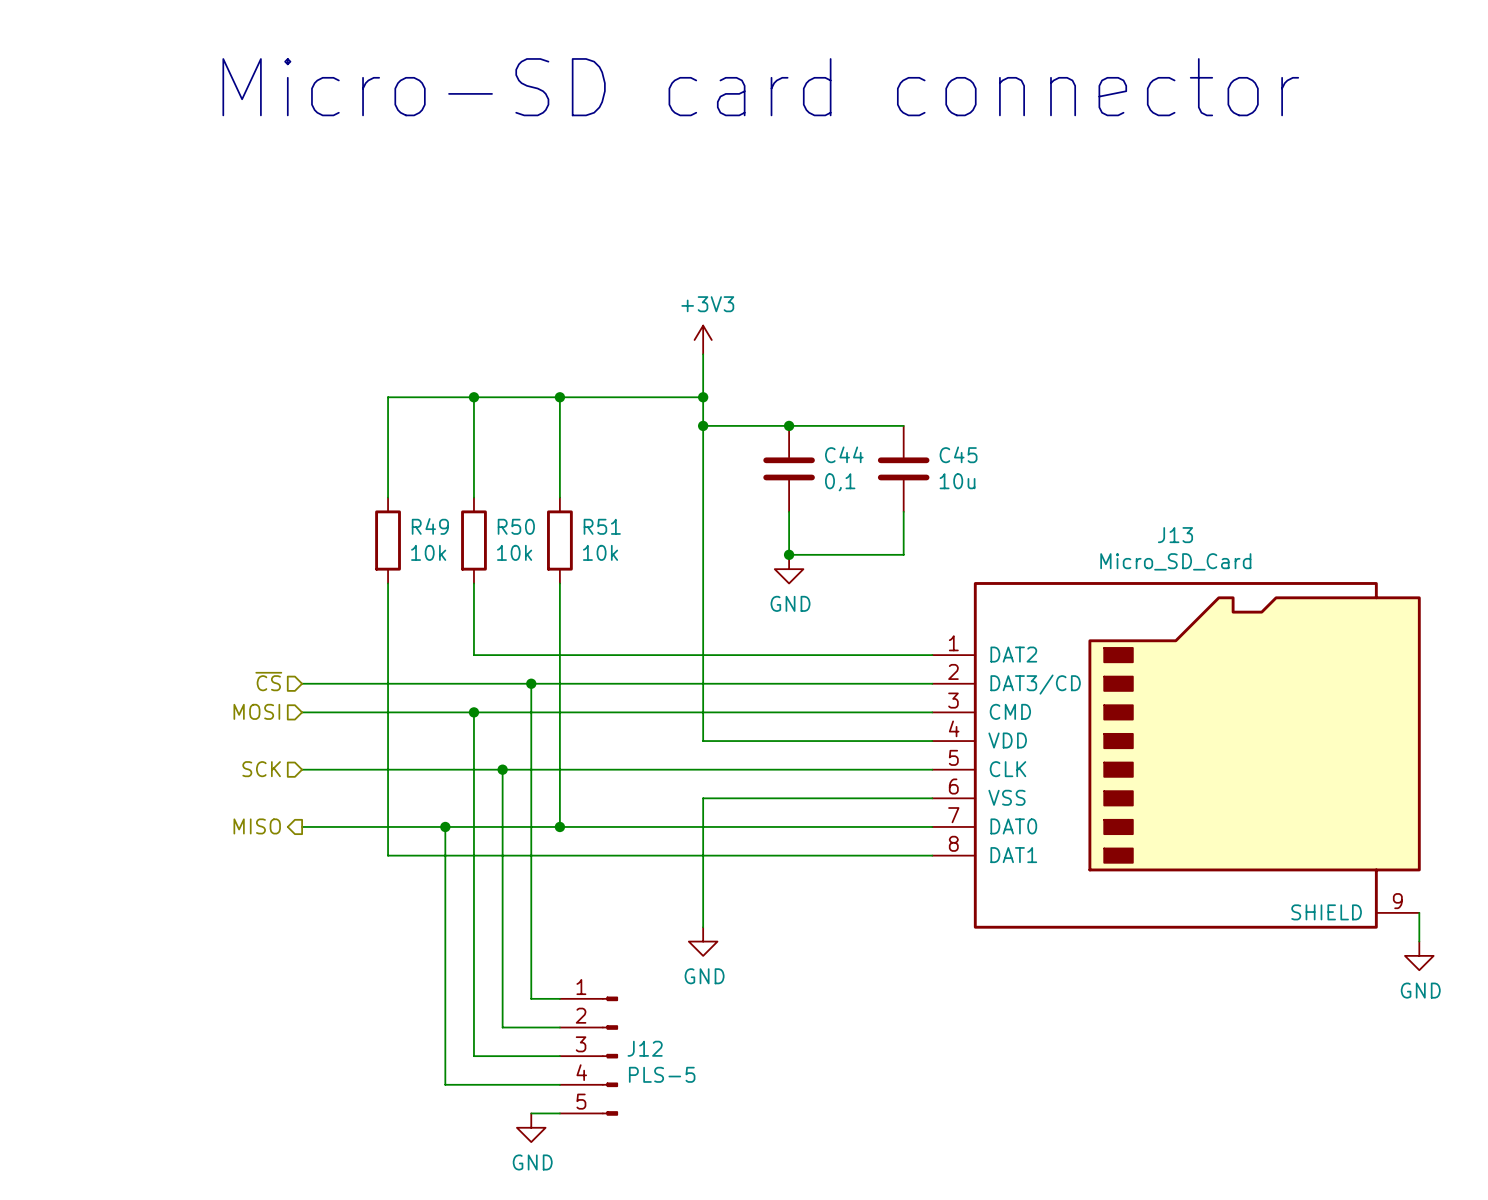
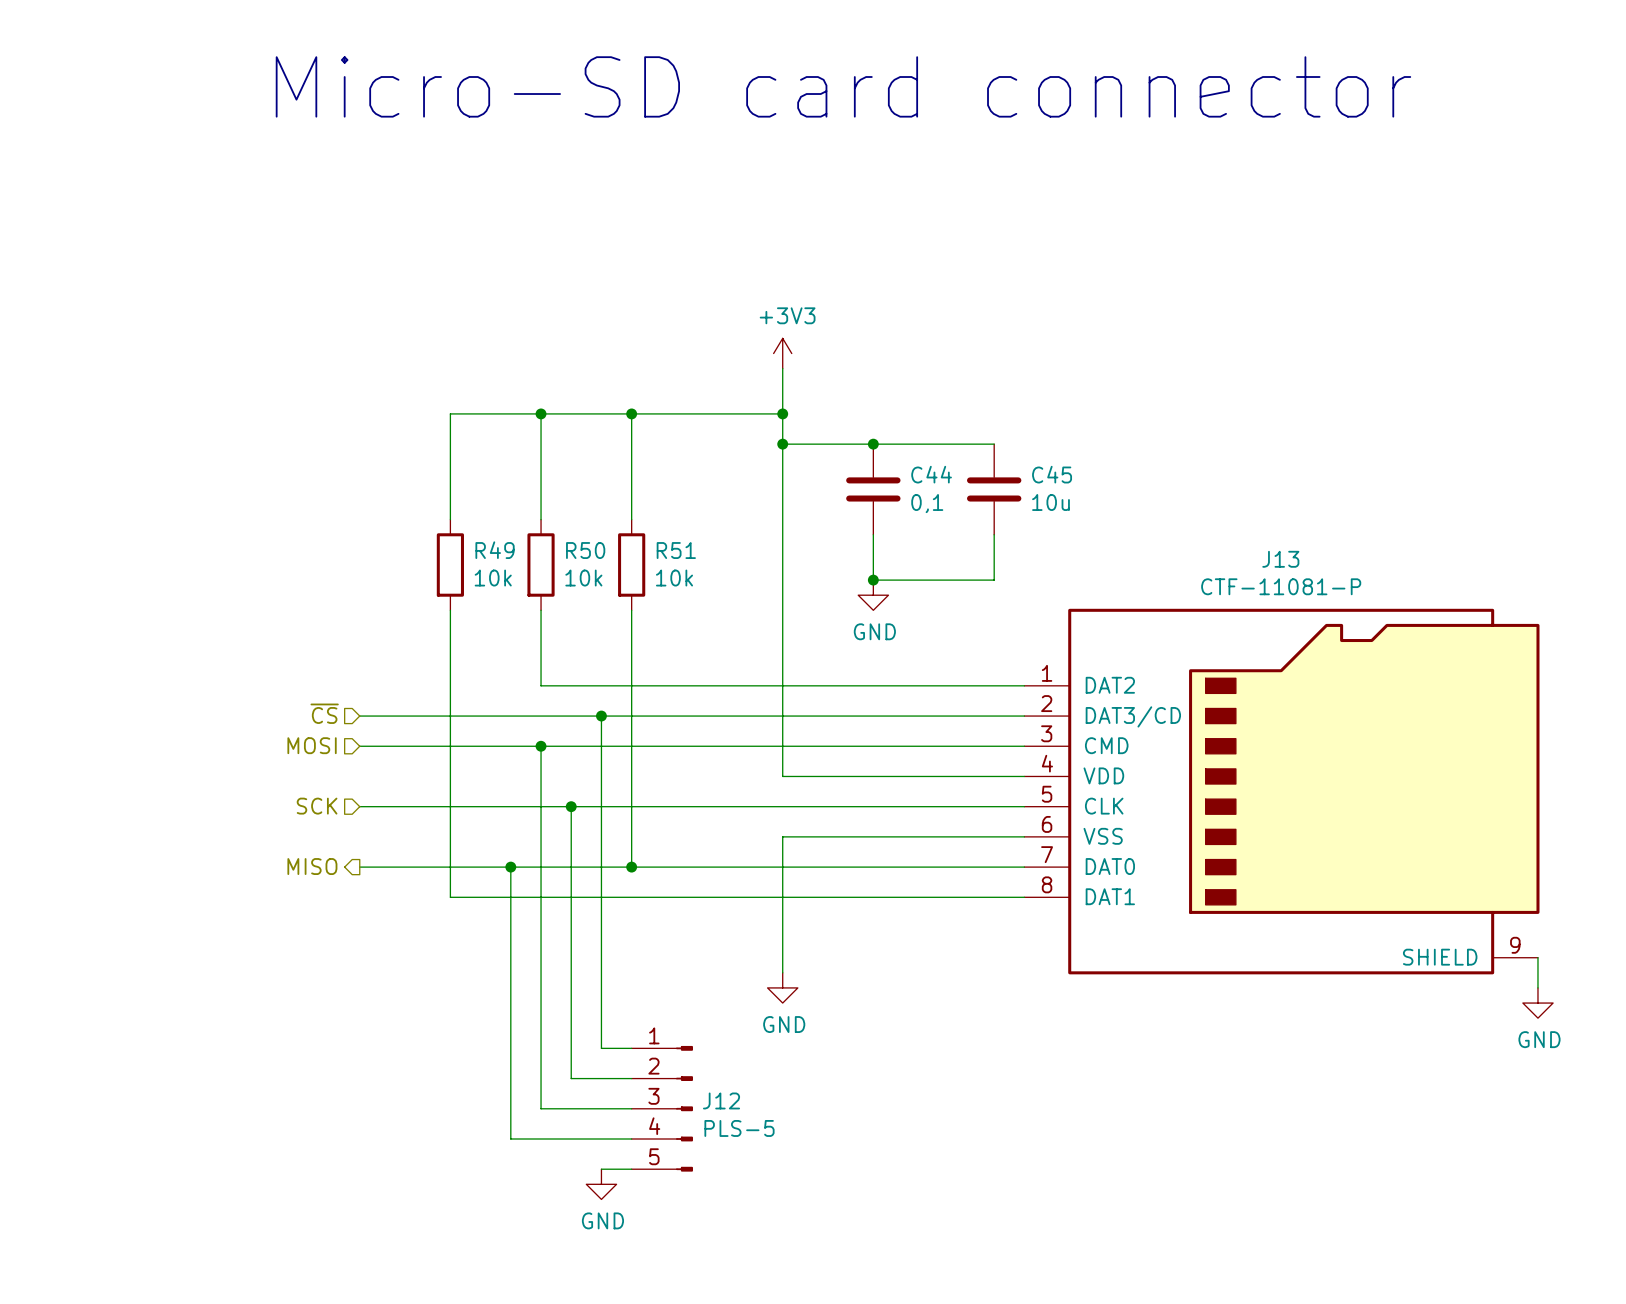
J13 value: Micro_SD_Card (1175, 561) -> CTF-11081-P (1281, 586)

